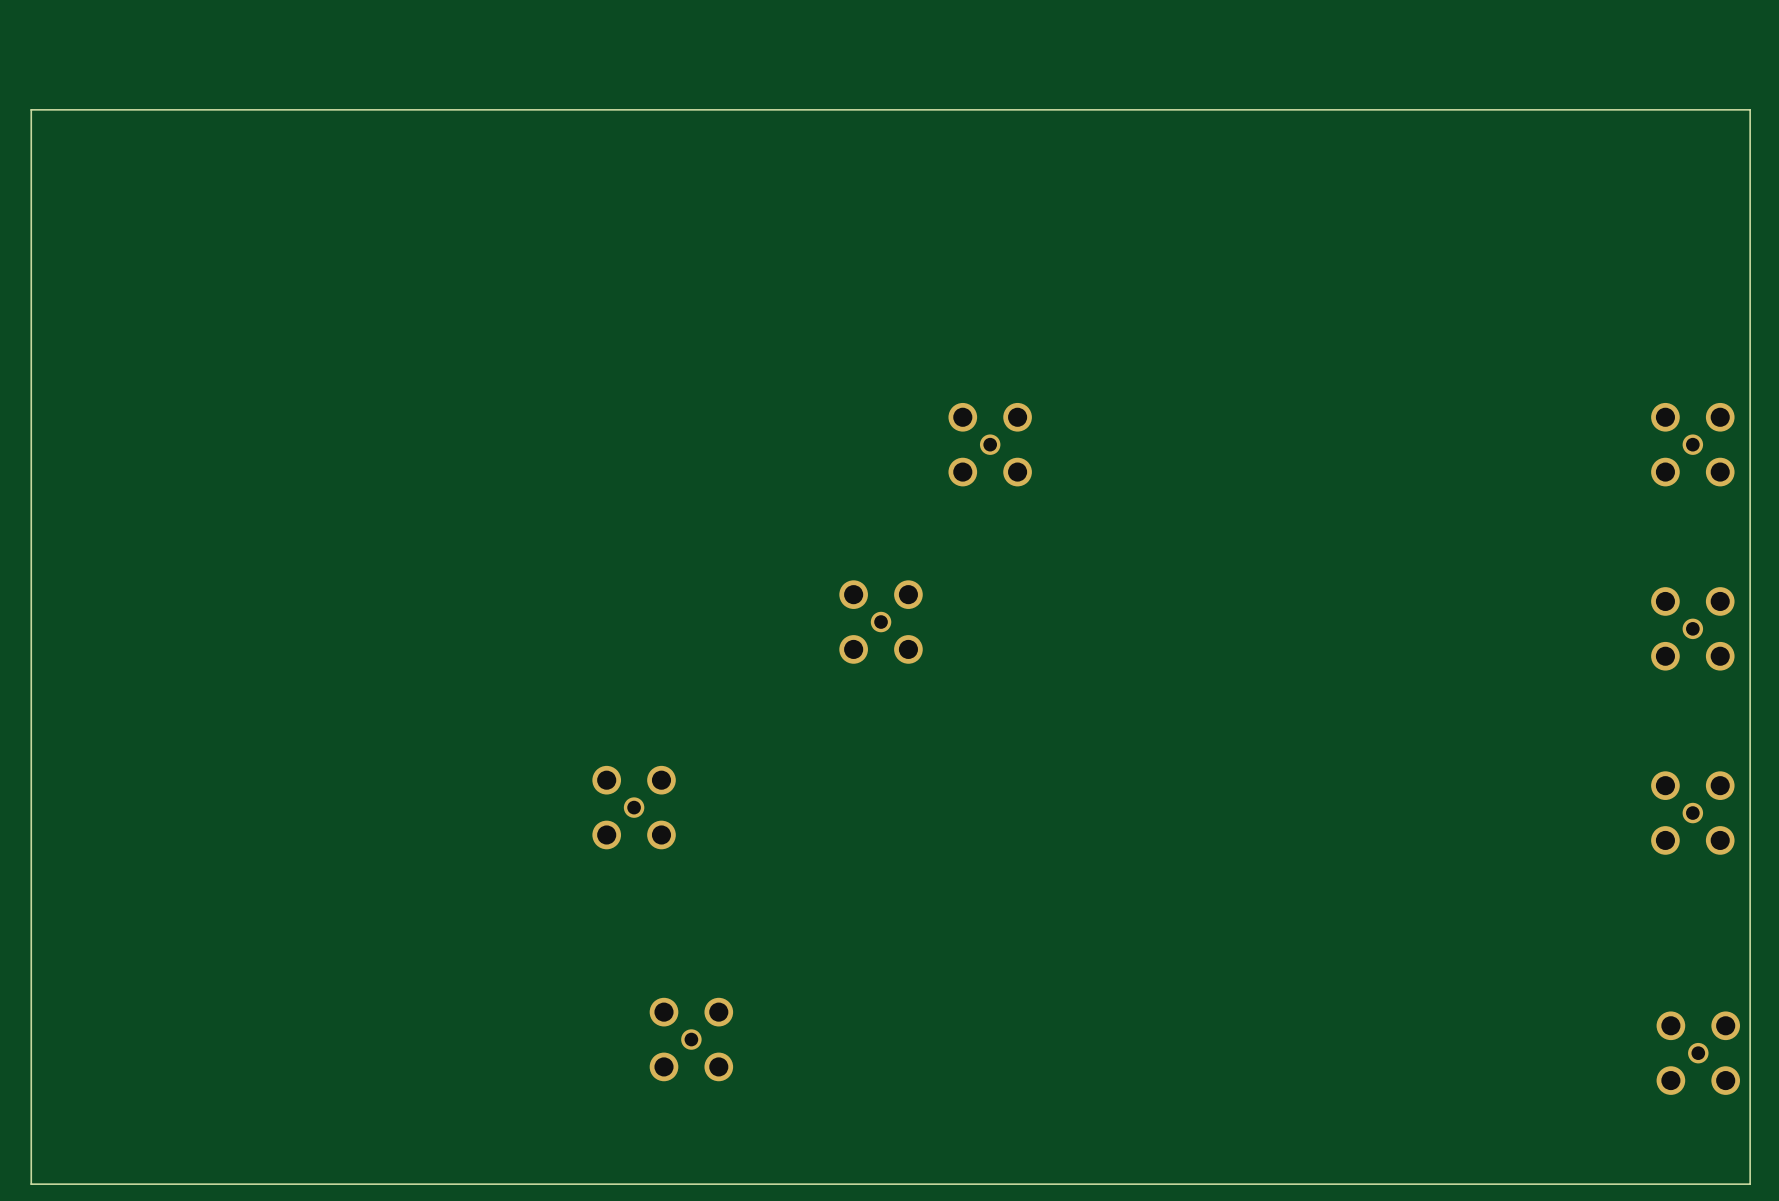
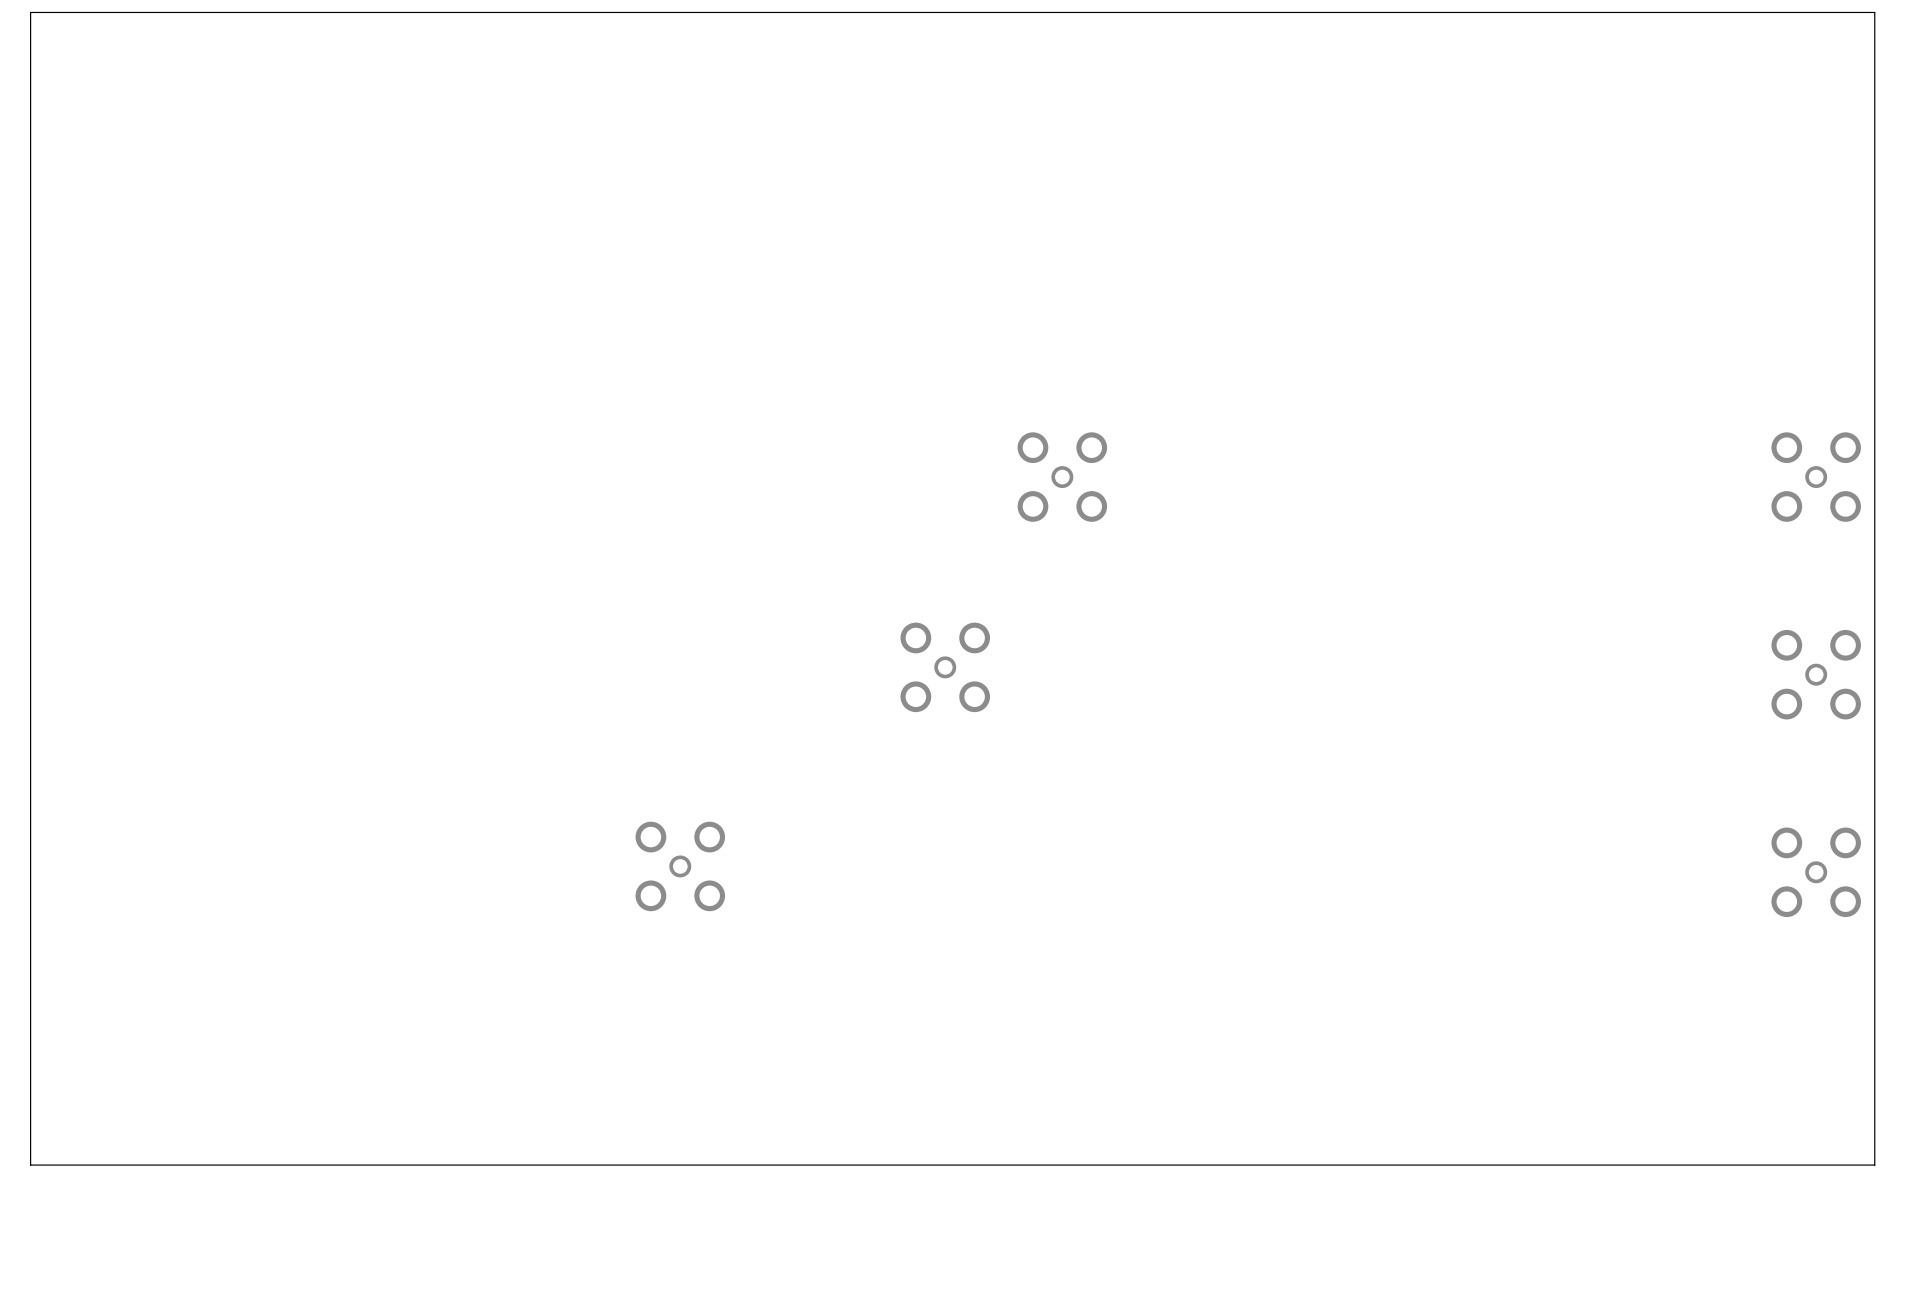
board edge: (1750, 109) (31, 109) (31, 1184) (1750, 1184) (1750, 109) -> (1874, 12) (30, 12) (30, 1165) (1874, 1165) (1874, 12)
part: (691, 1039) -> none
part: (1698, 1053) -> none

